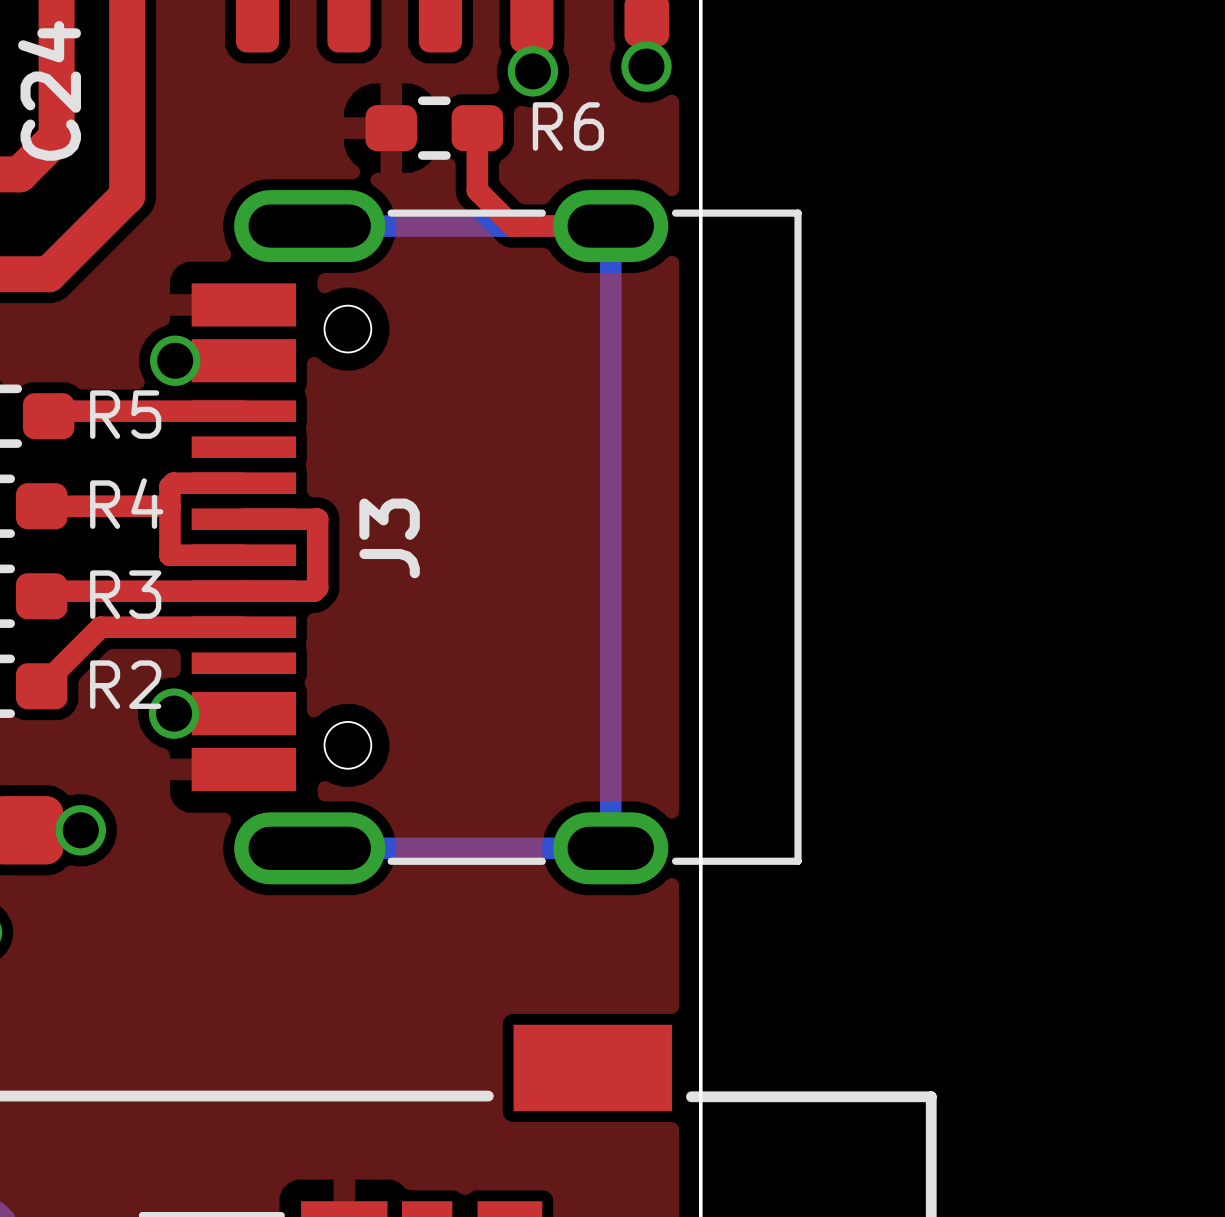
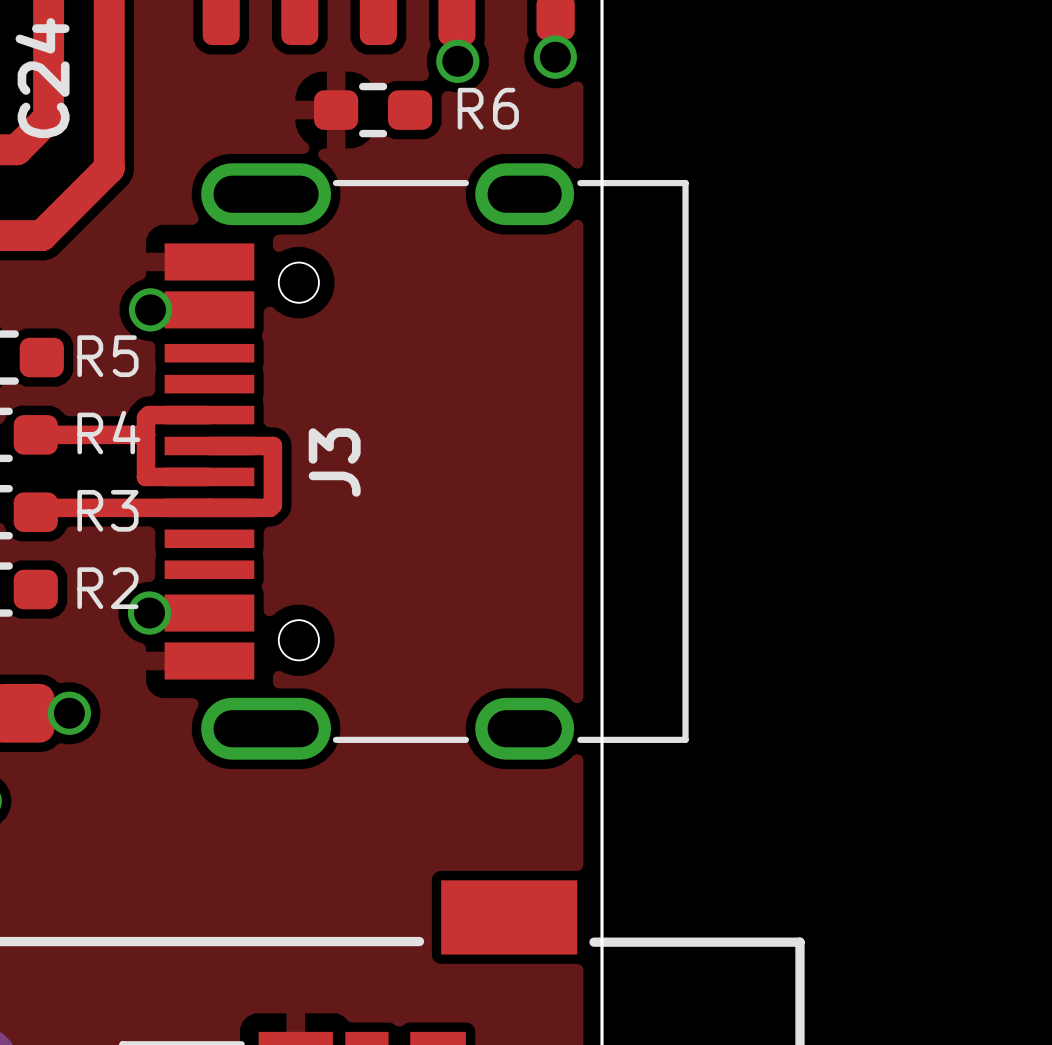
top track: (477, 128) (477, 190) (512, 226) (610, 226) -> none
bottom track: (309, 226) (610, 226) (610, 848) (309, 848) -> none
top track: (53, 411) (243, 411) -> none
top track: (243, 627) (100, 627) (41, 686) -> none

